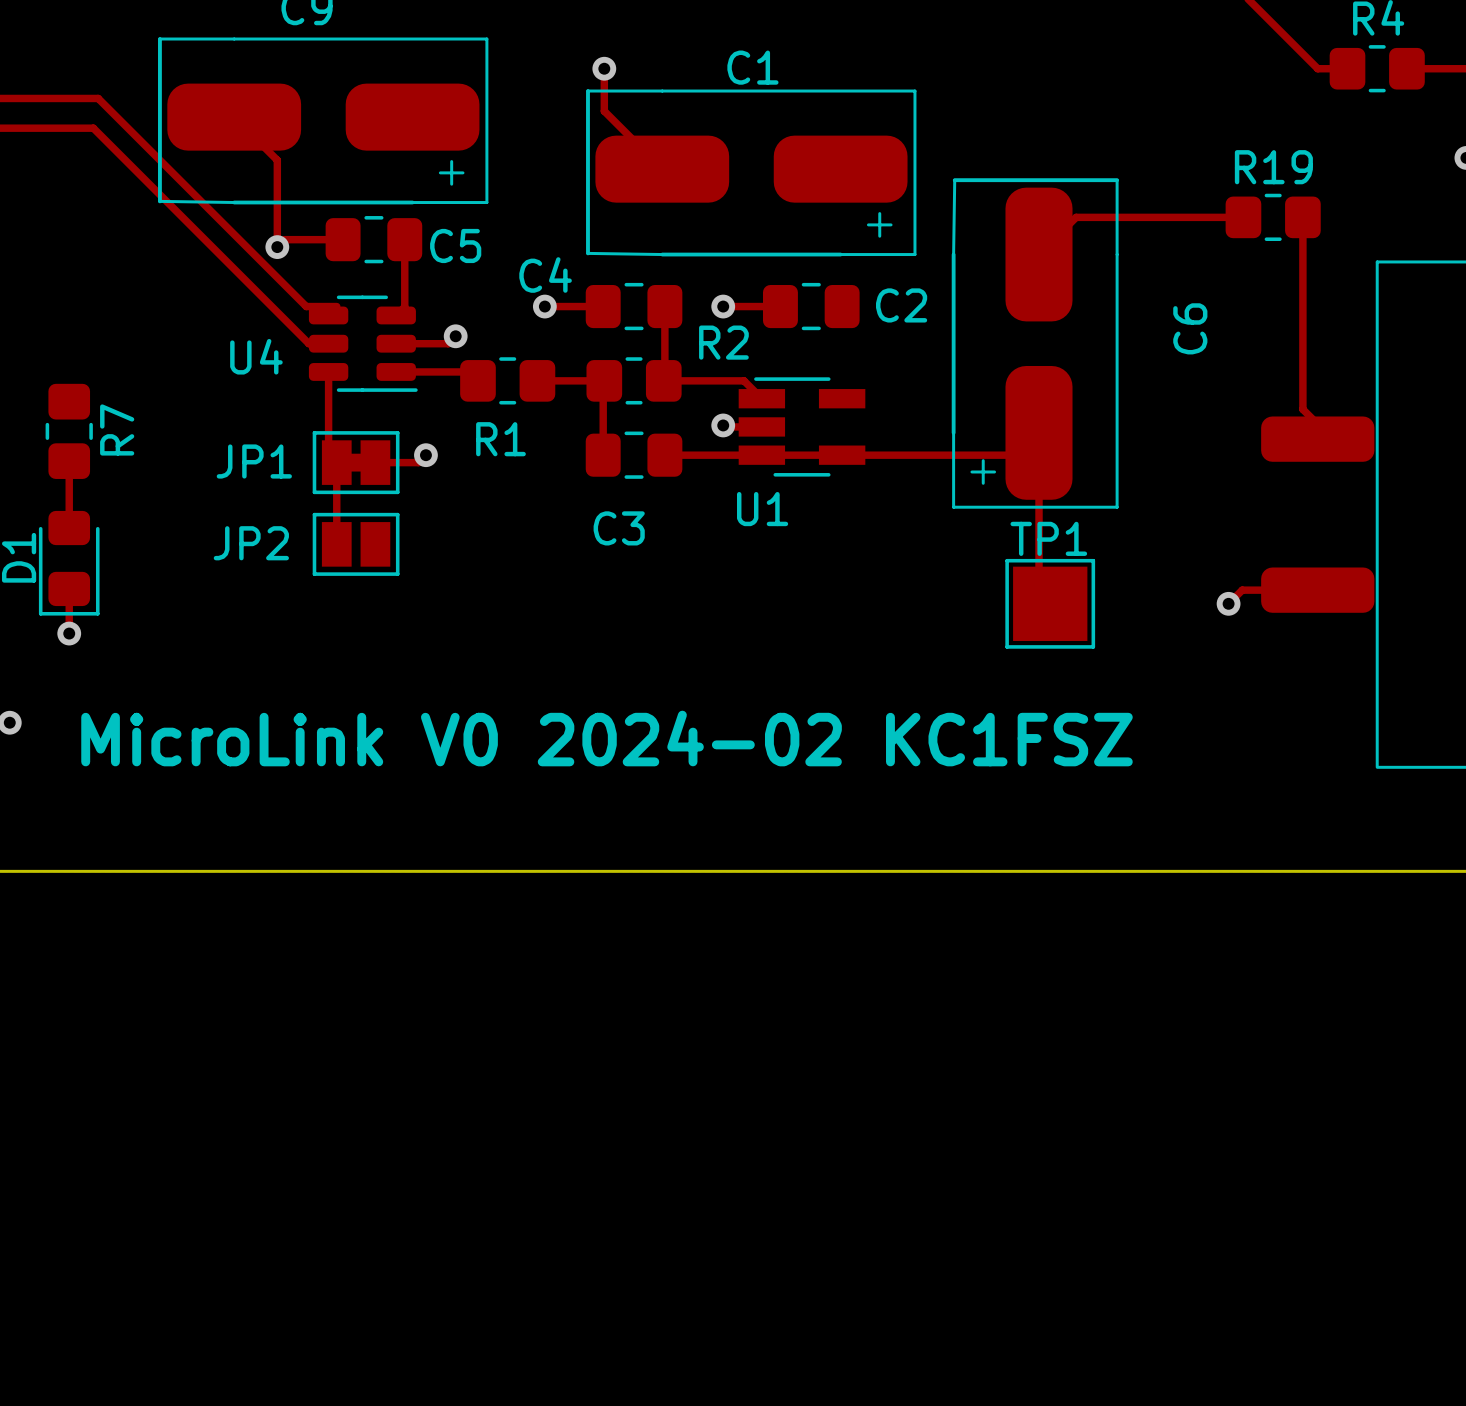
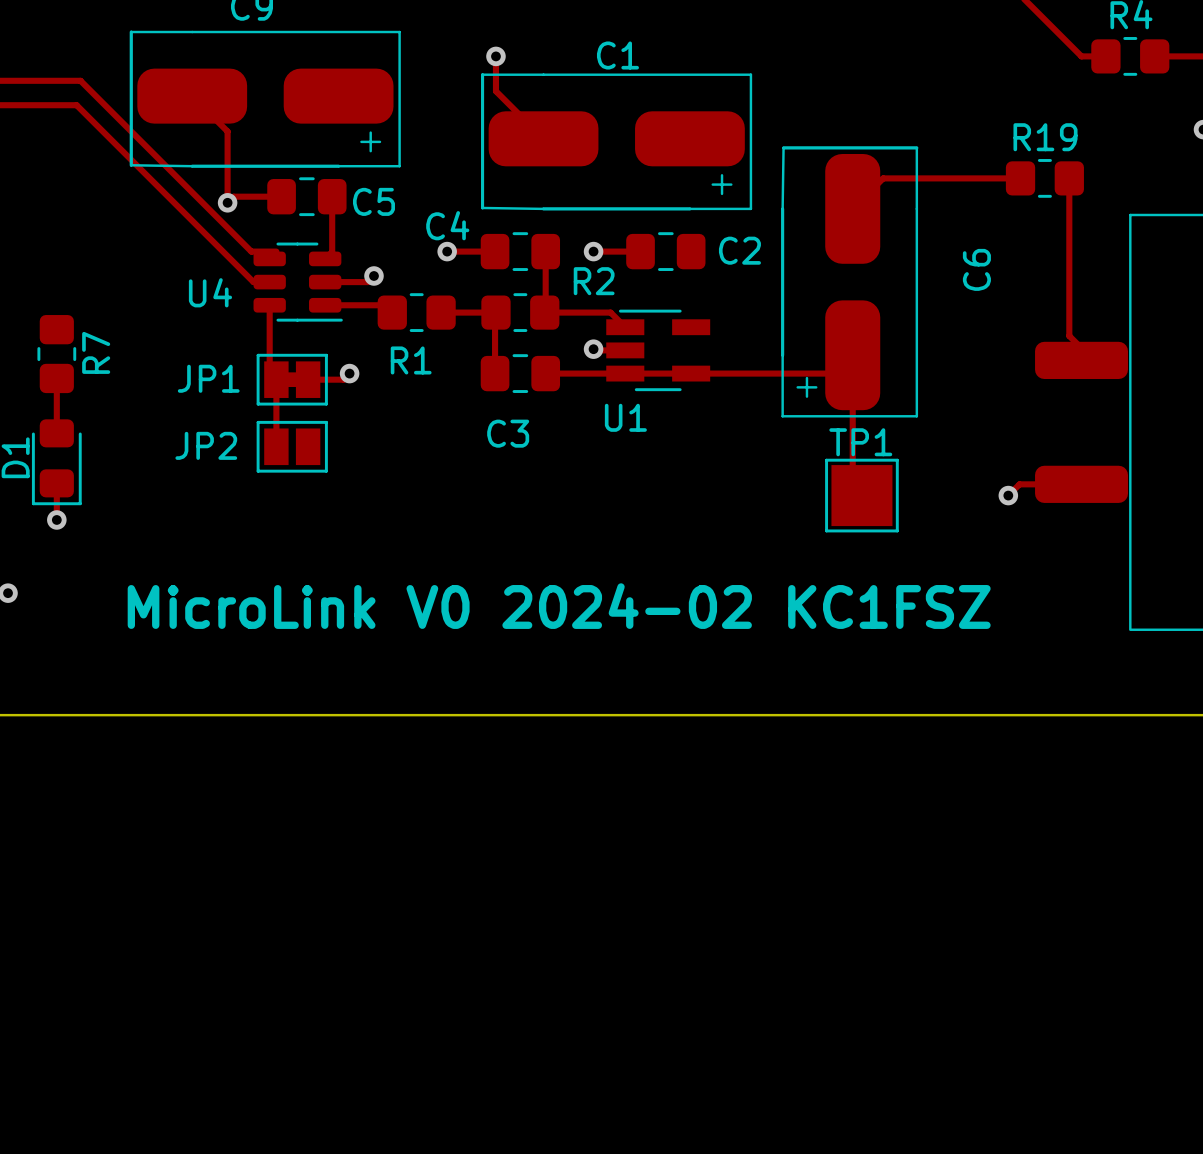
text position: MicroLink V0 2024-02 KC1FSZ (607, 738) -> MicroLink V0 2024-02 KC1FSZ (559, 606)

